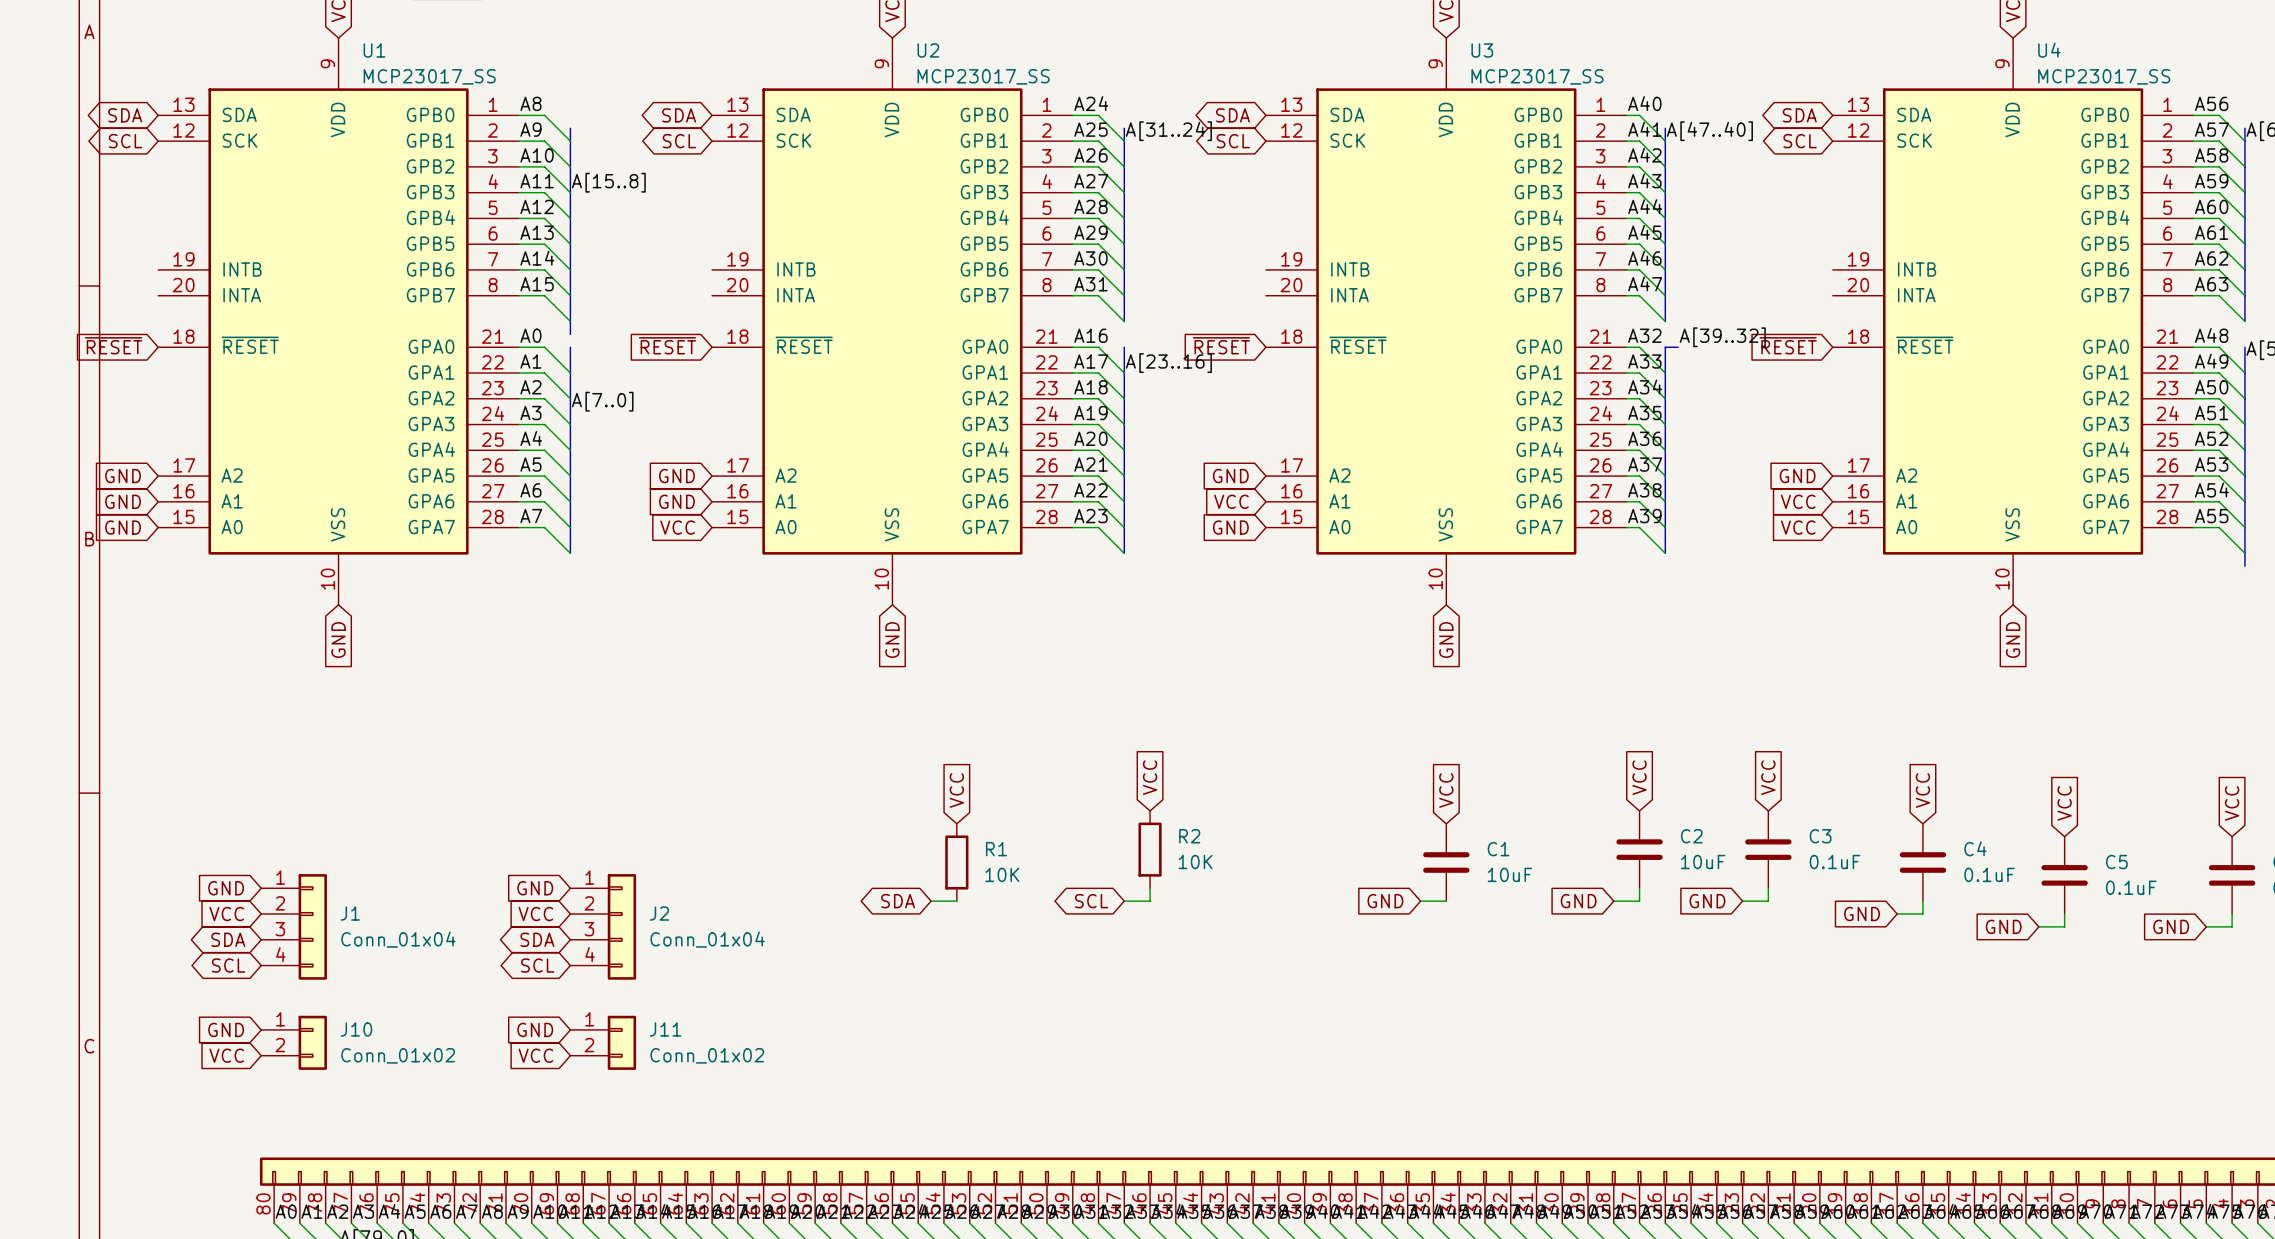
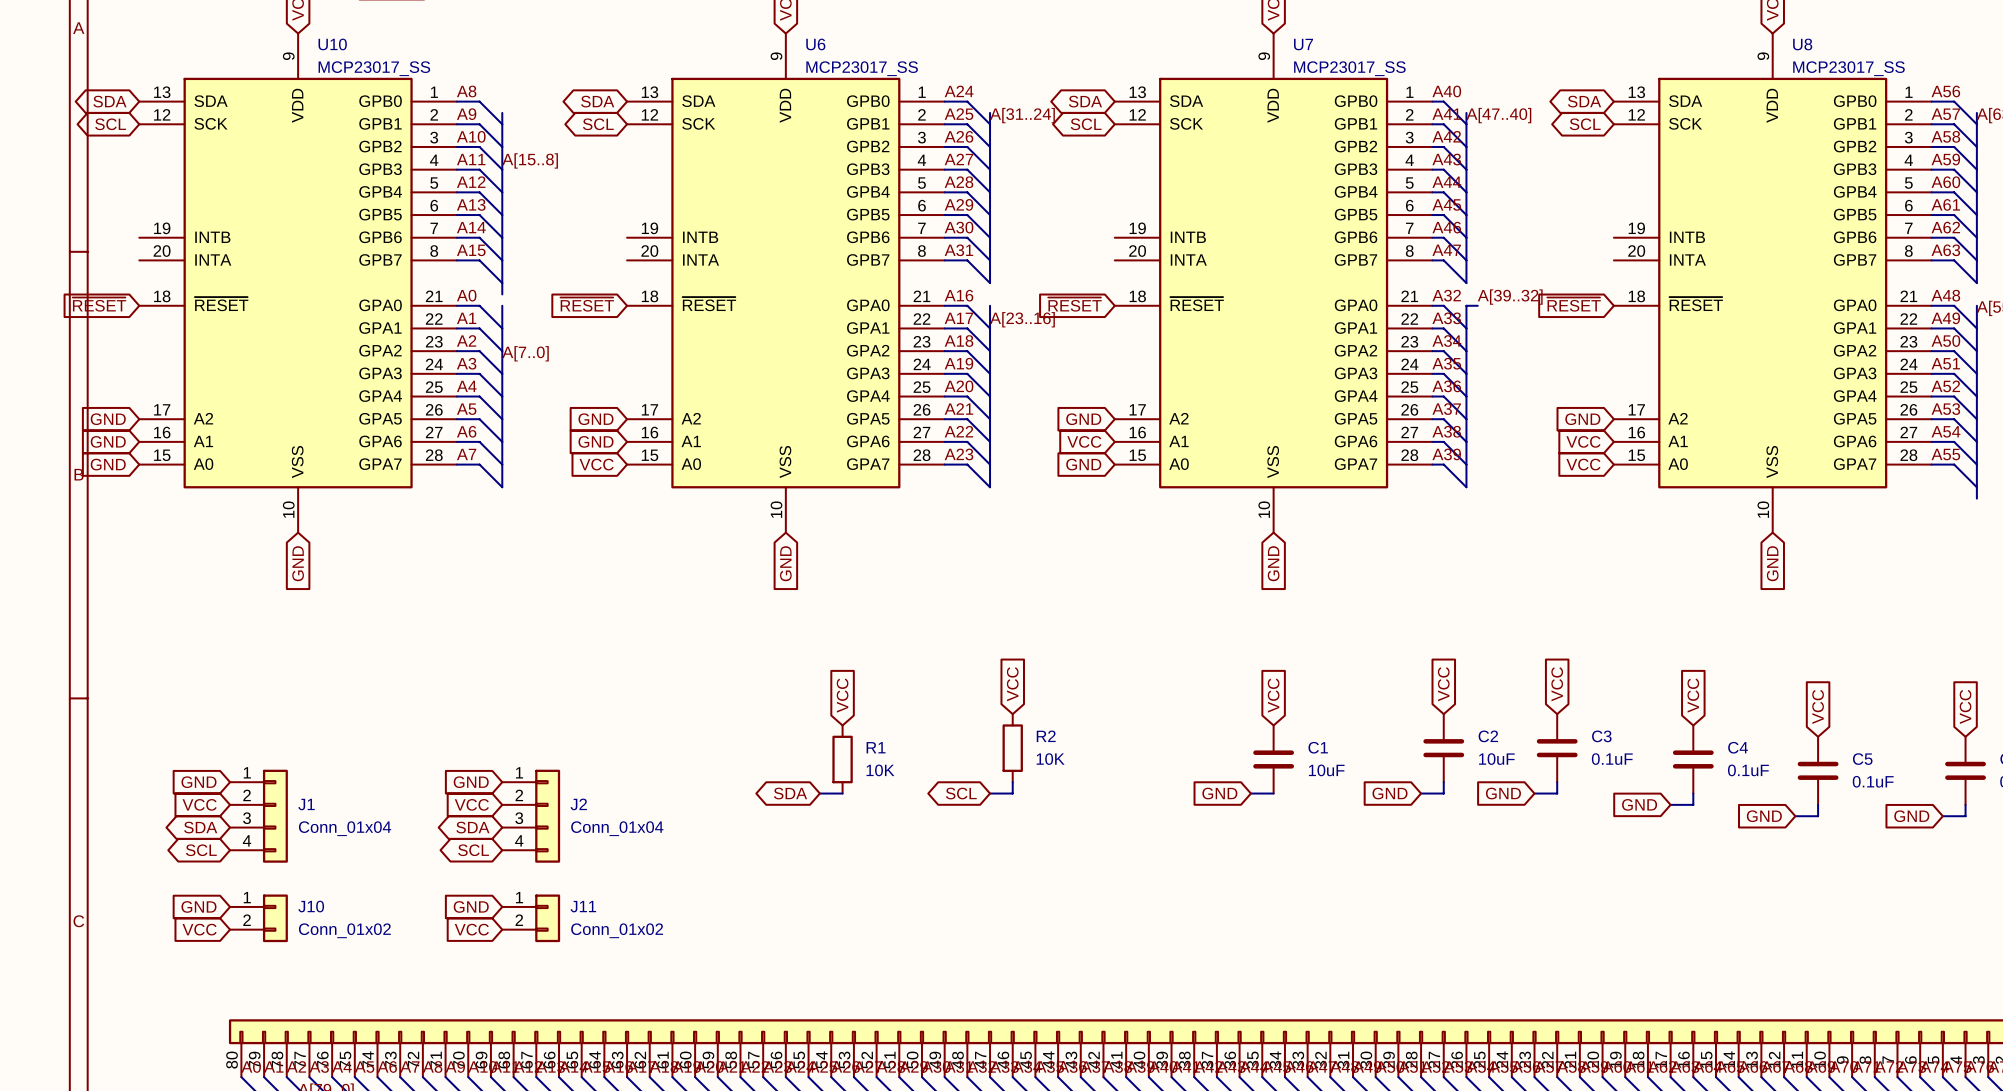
U1 name: U1 (374, 50) -> U10 (332, 44)
U2 name: U2 (928, 50) -> U6 (815, 44)
U3 name: U3 (1482, 50) -> U7 (1303, 44)
U4 name: U4 (2049, 50) -> U8 (1802, 44)

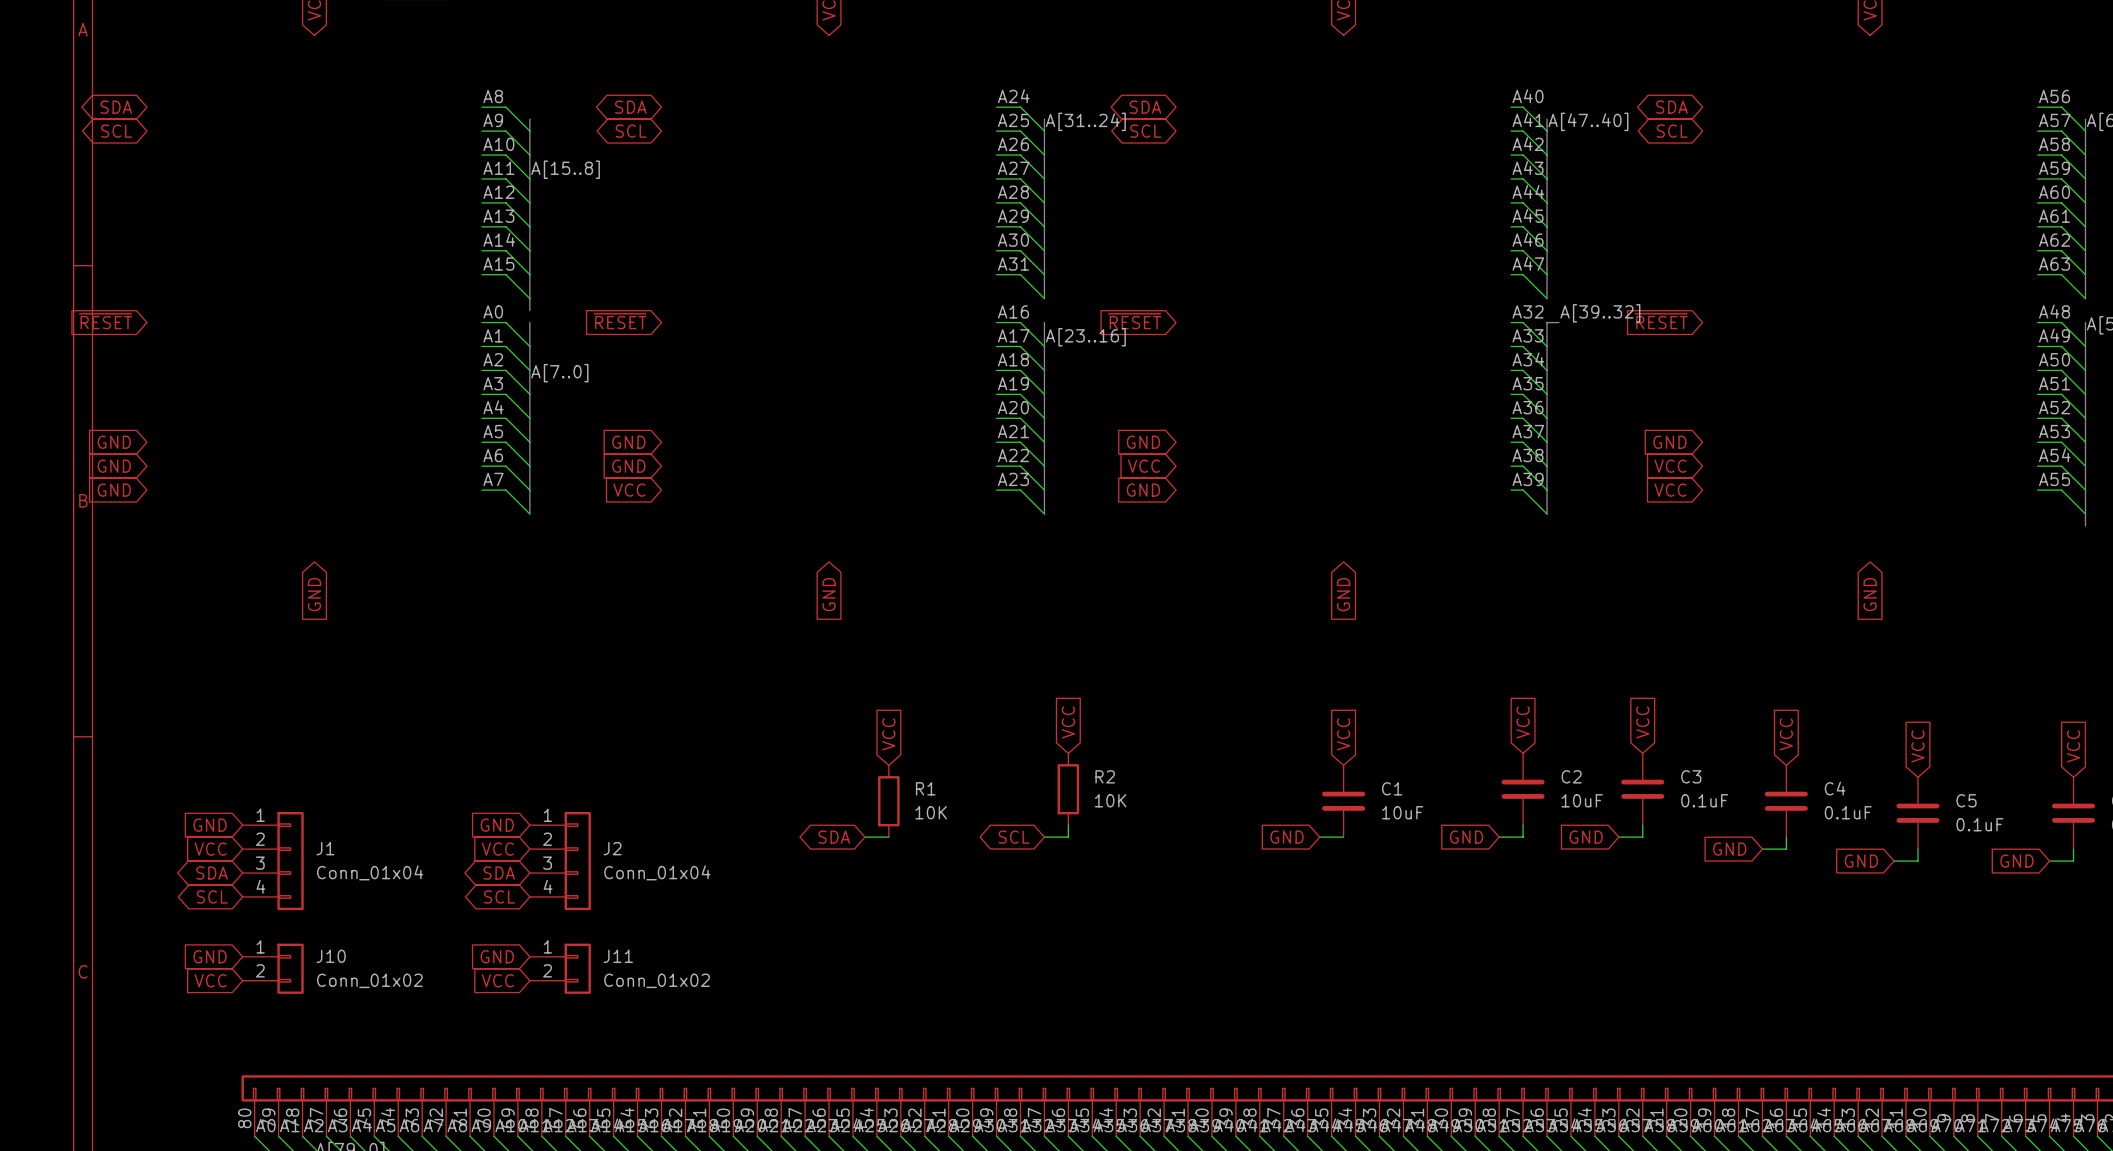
U10: MCP23017_SS (298, 283) -> none
U6: MCP23017_SS (785, 283) -> none
U7: MCP23017_SS (1273, 283) -> none
U8: MCP23017_SS (1772, 283) -> none

